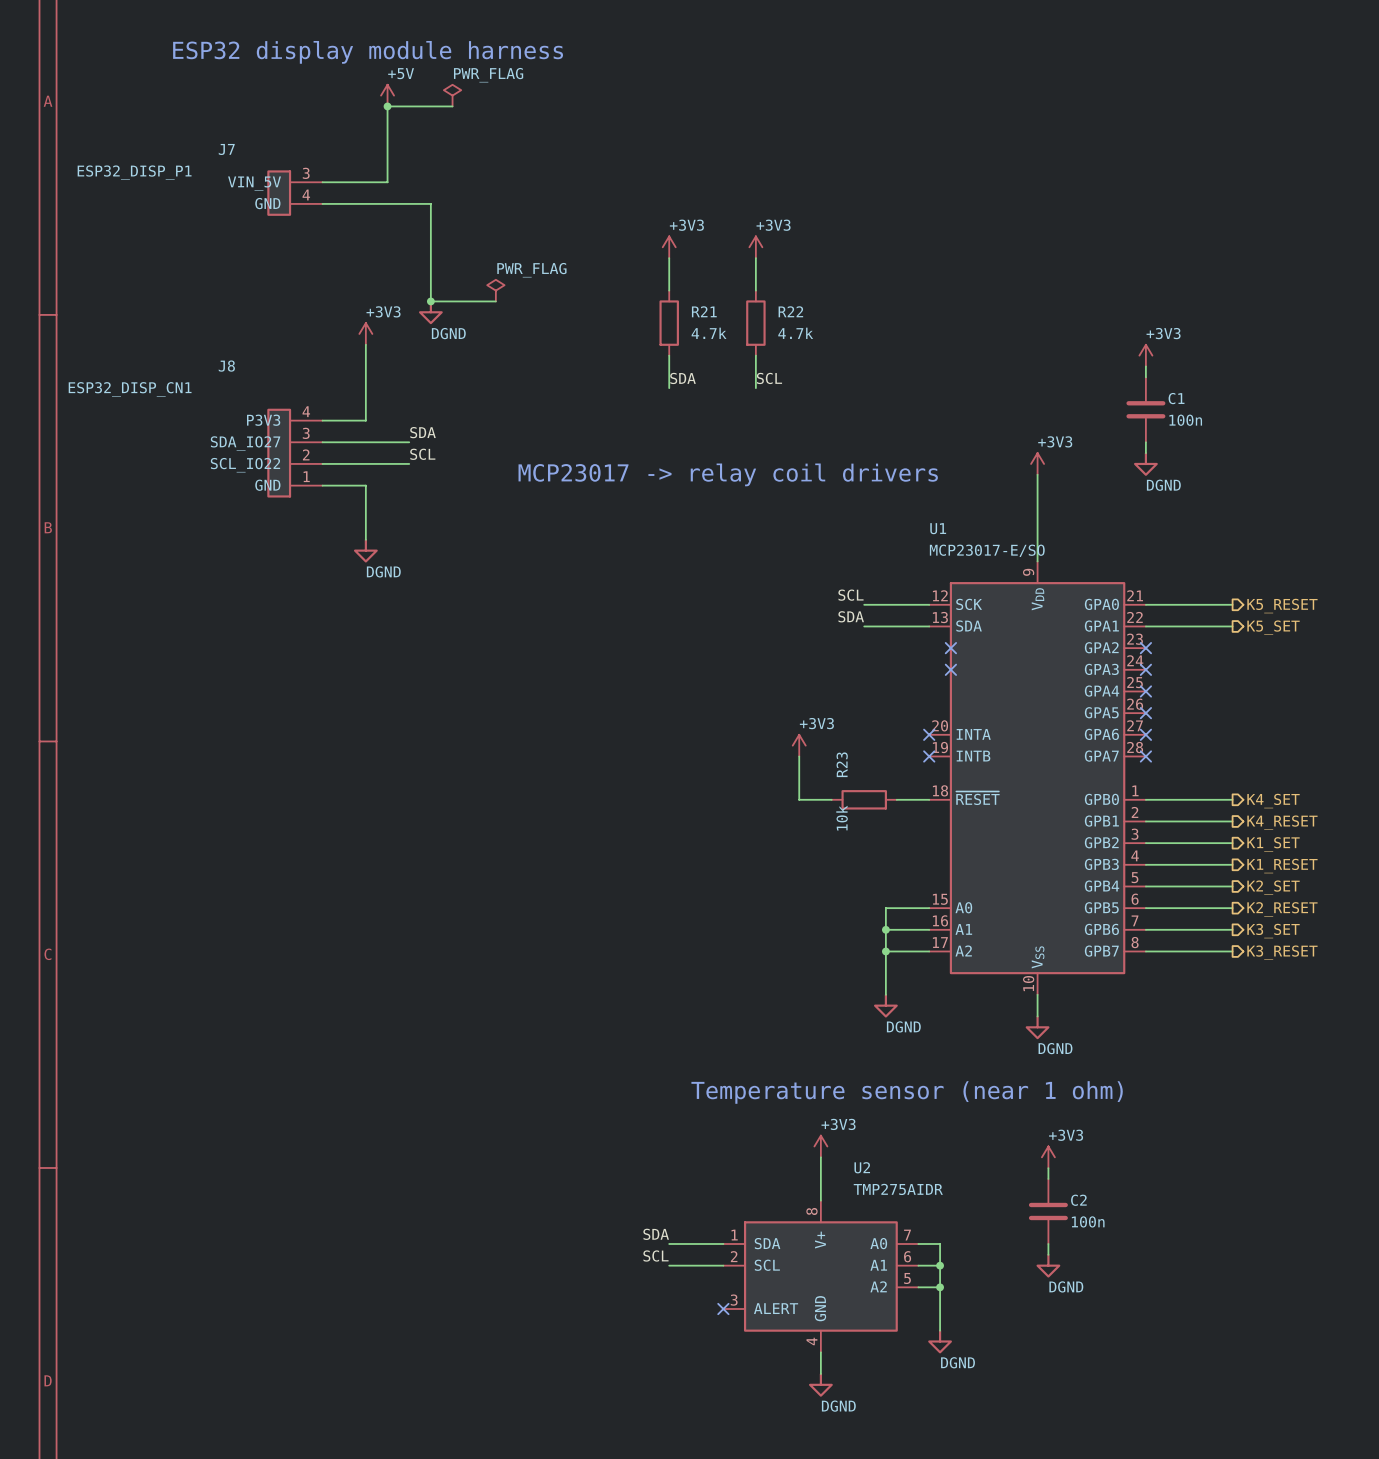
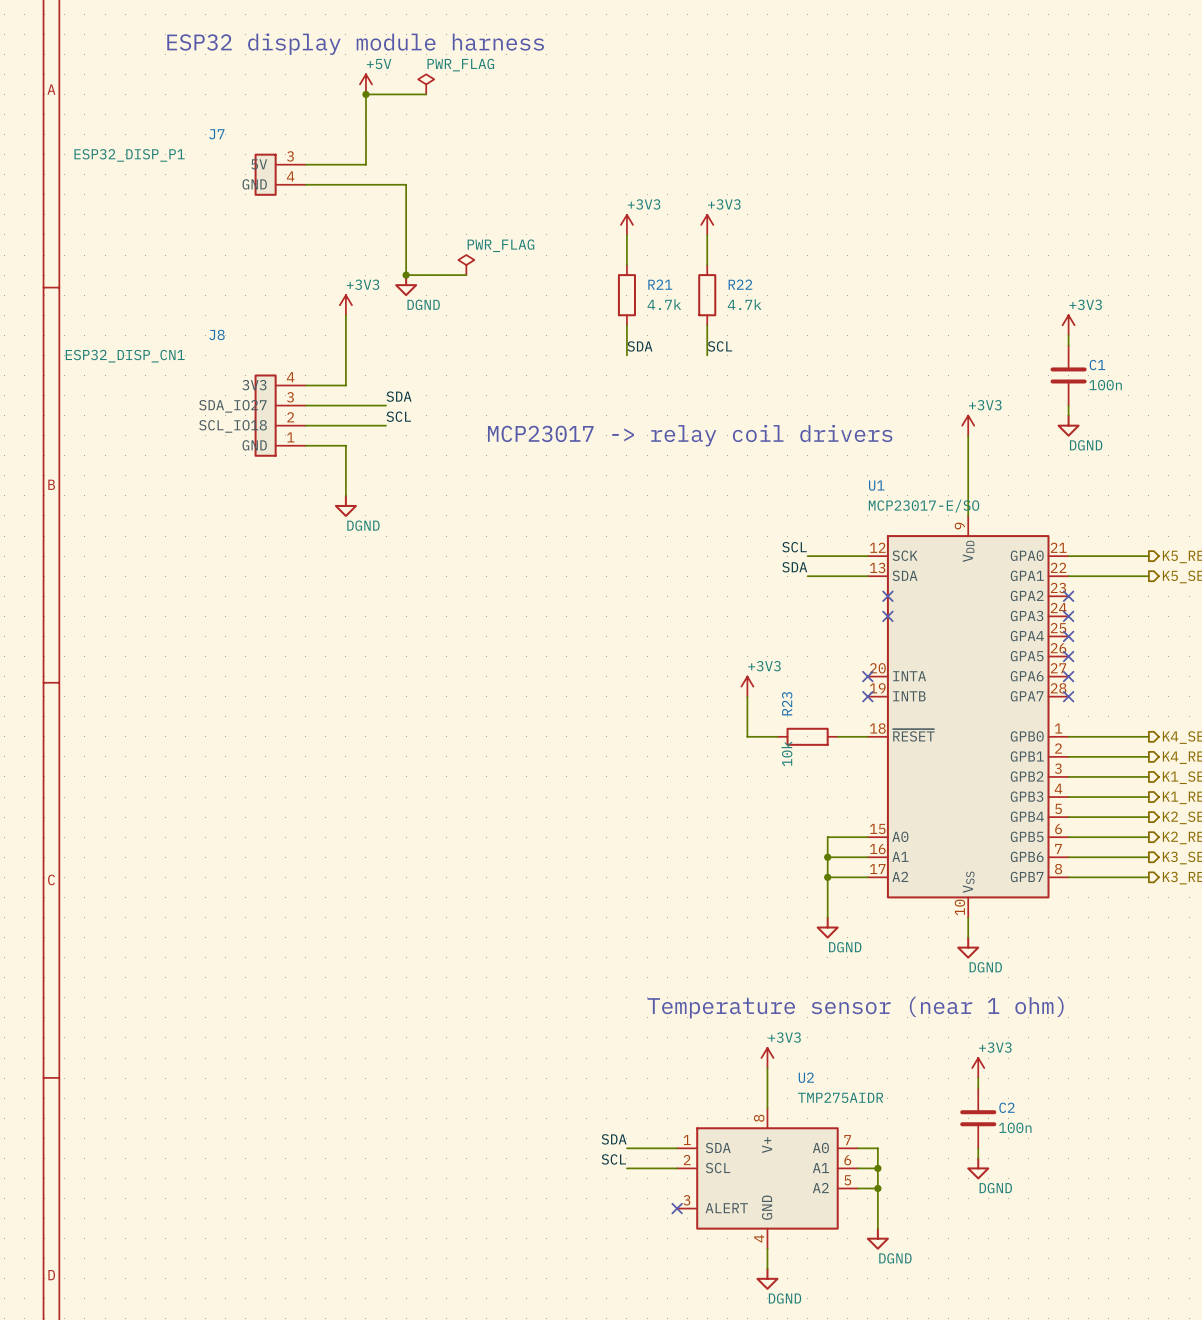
J7 pin name: VIN_5V (254, 183) -> 5V (259, 164)
J8 pin name: P3V3 (263, 420) -> 3V3 (254, 385)
J8 pin name: SCL_IO22 (245, 465) -> SCL_IO18 (233, 426)

